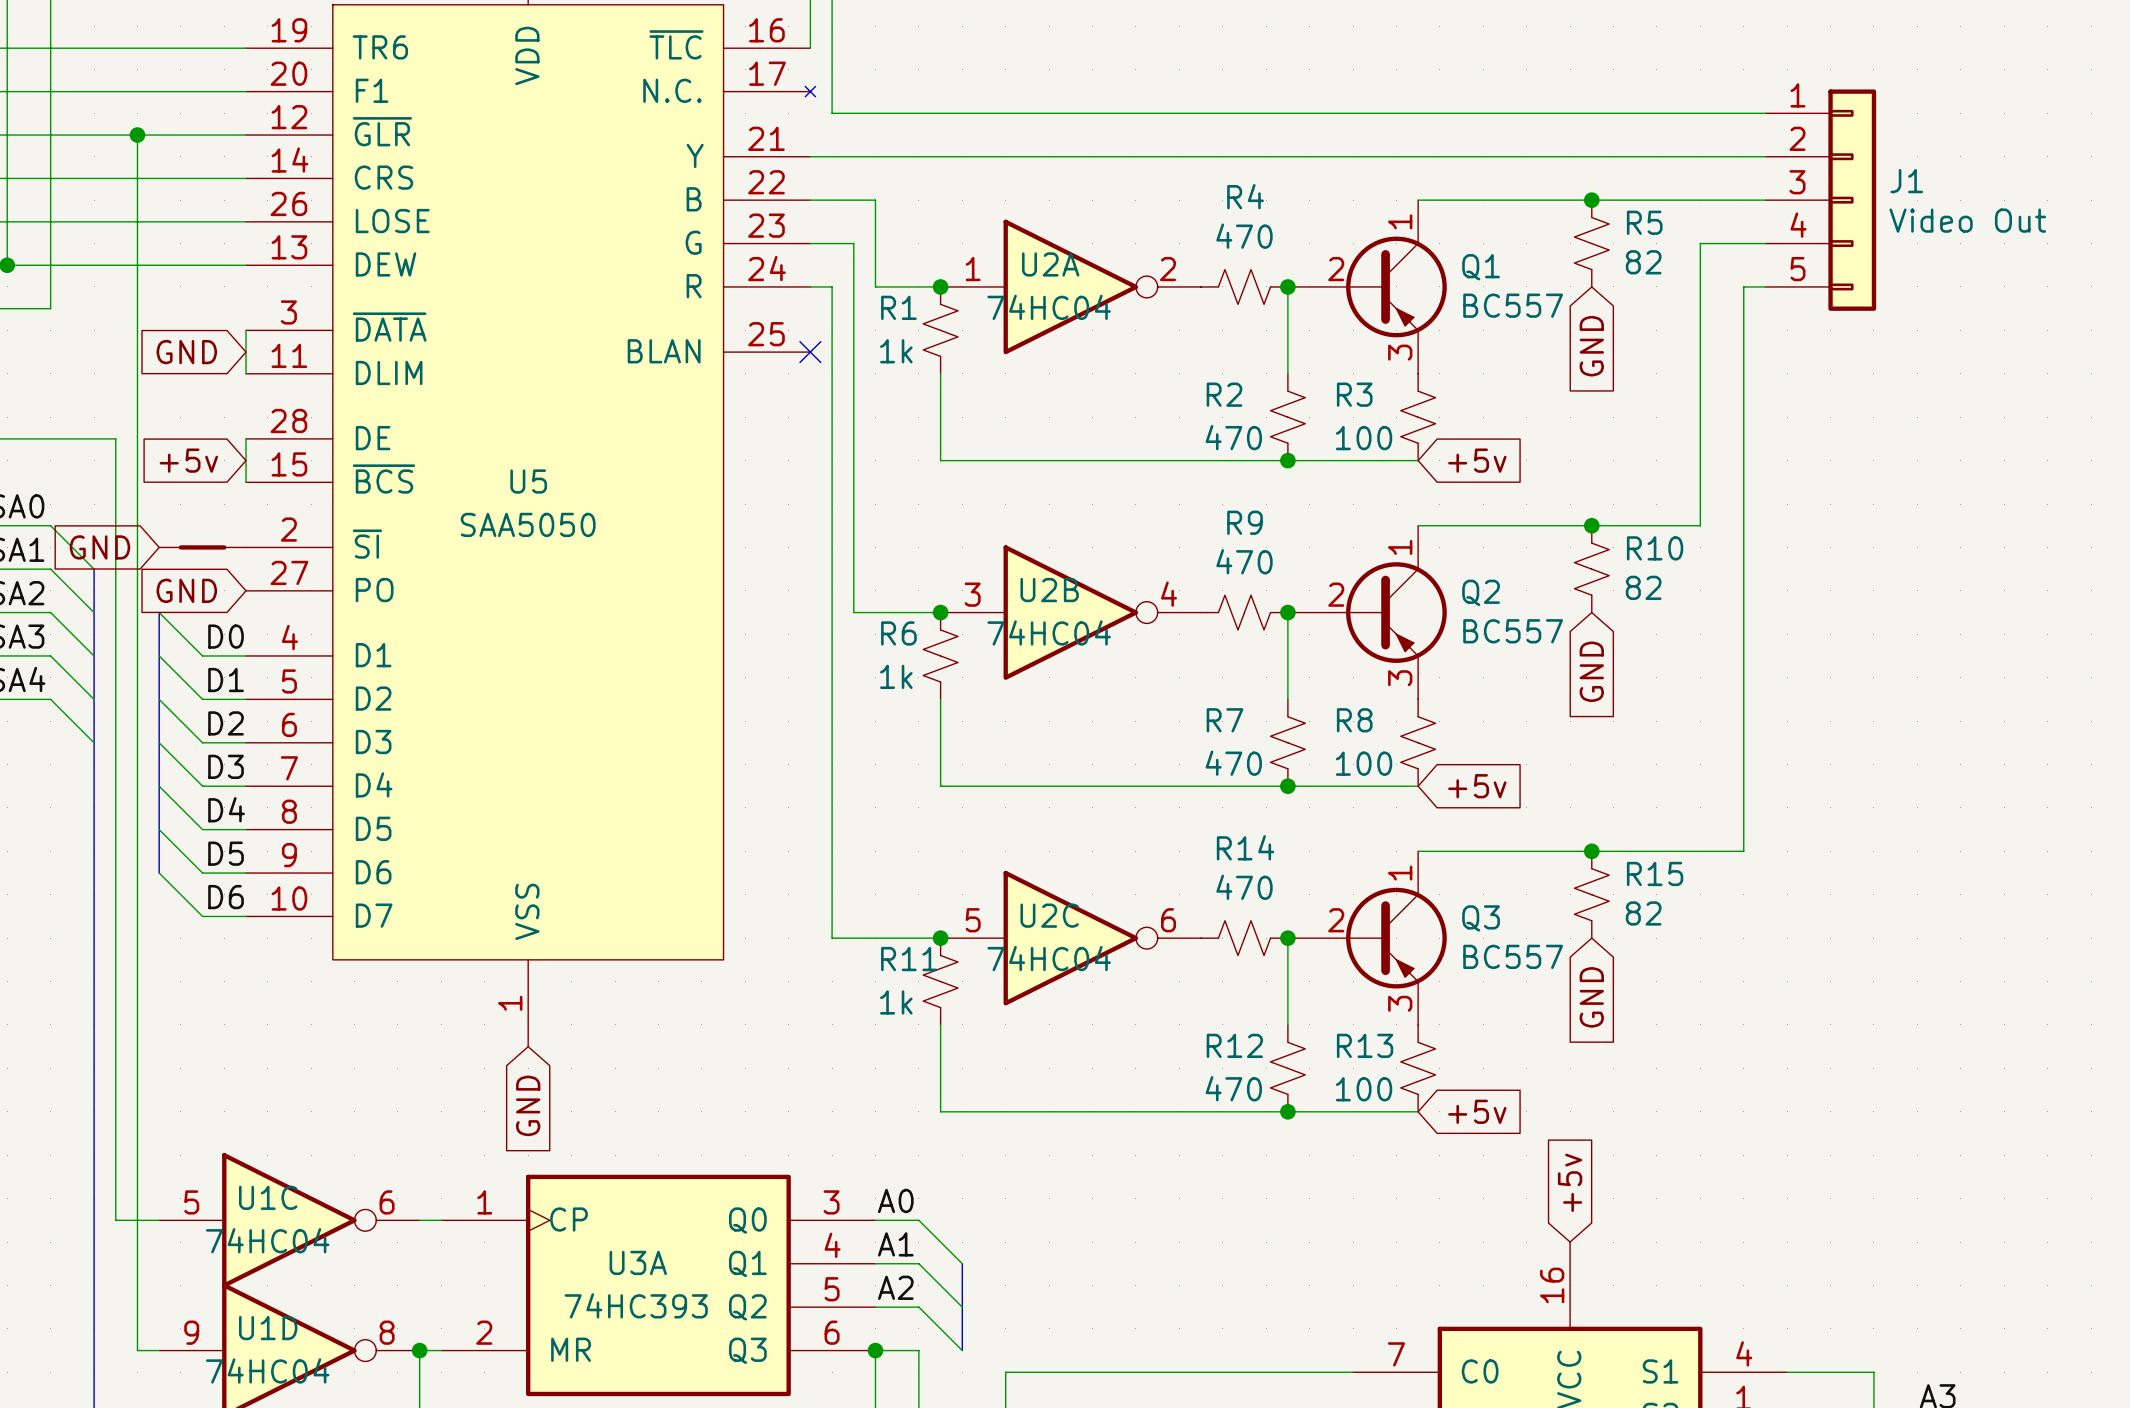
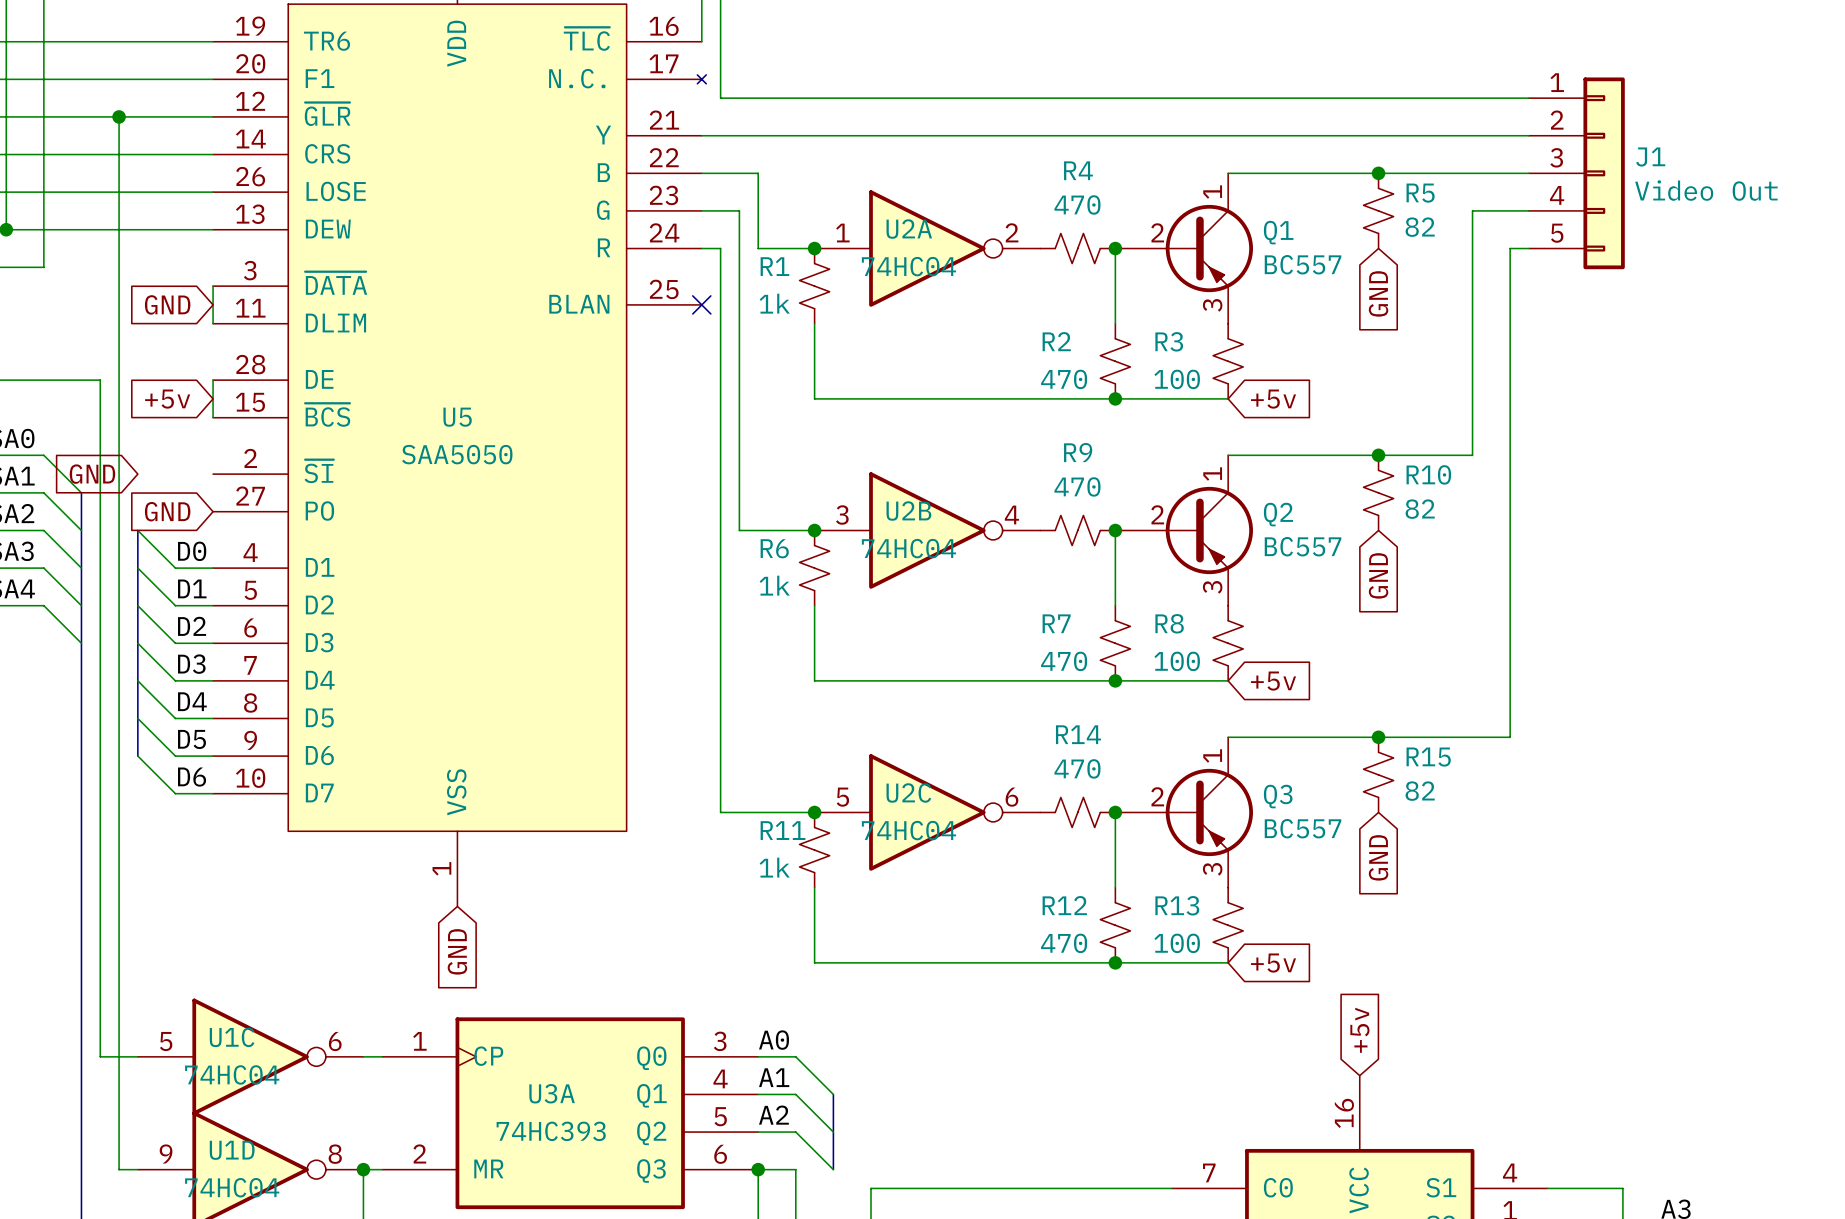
part: (202, 547) -> none

